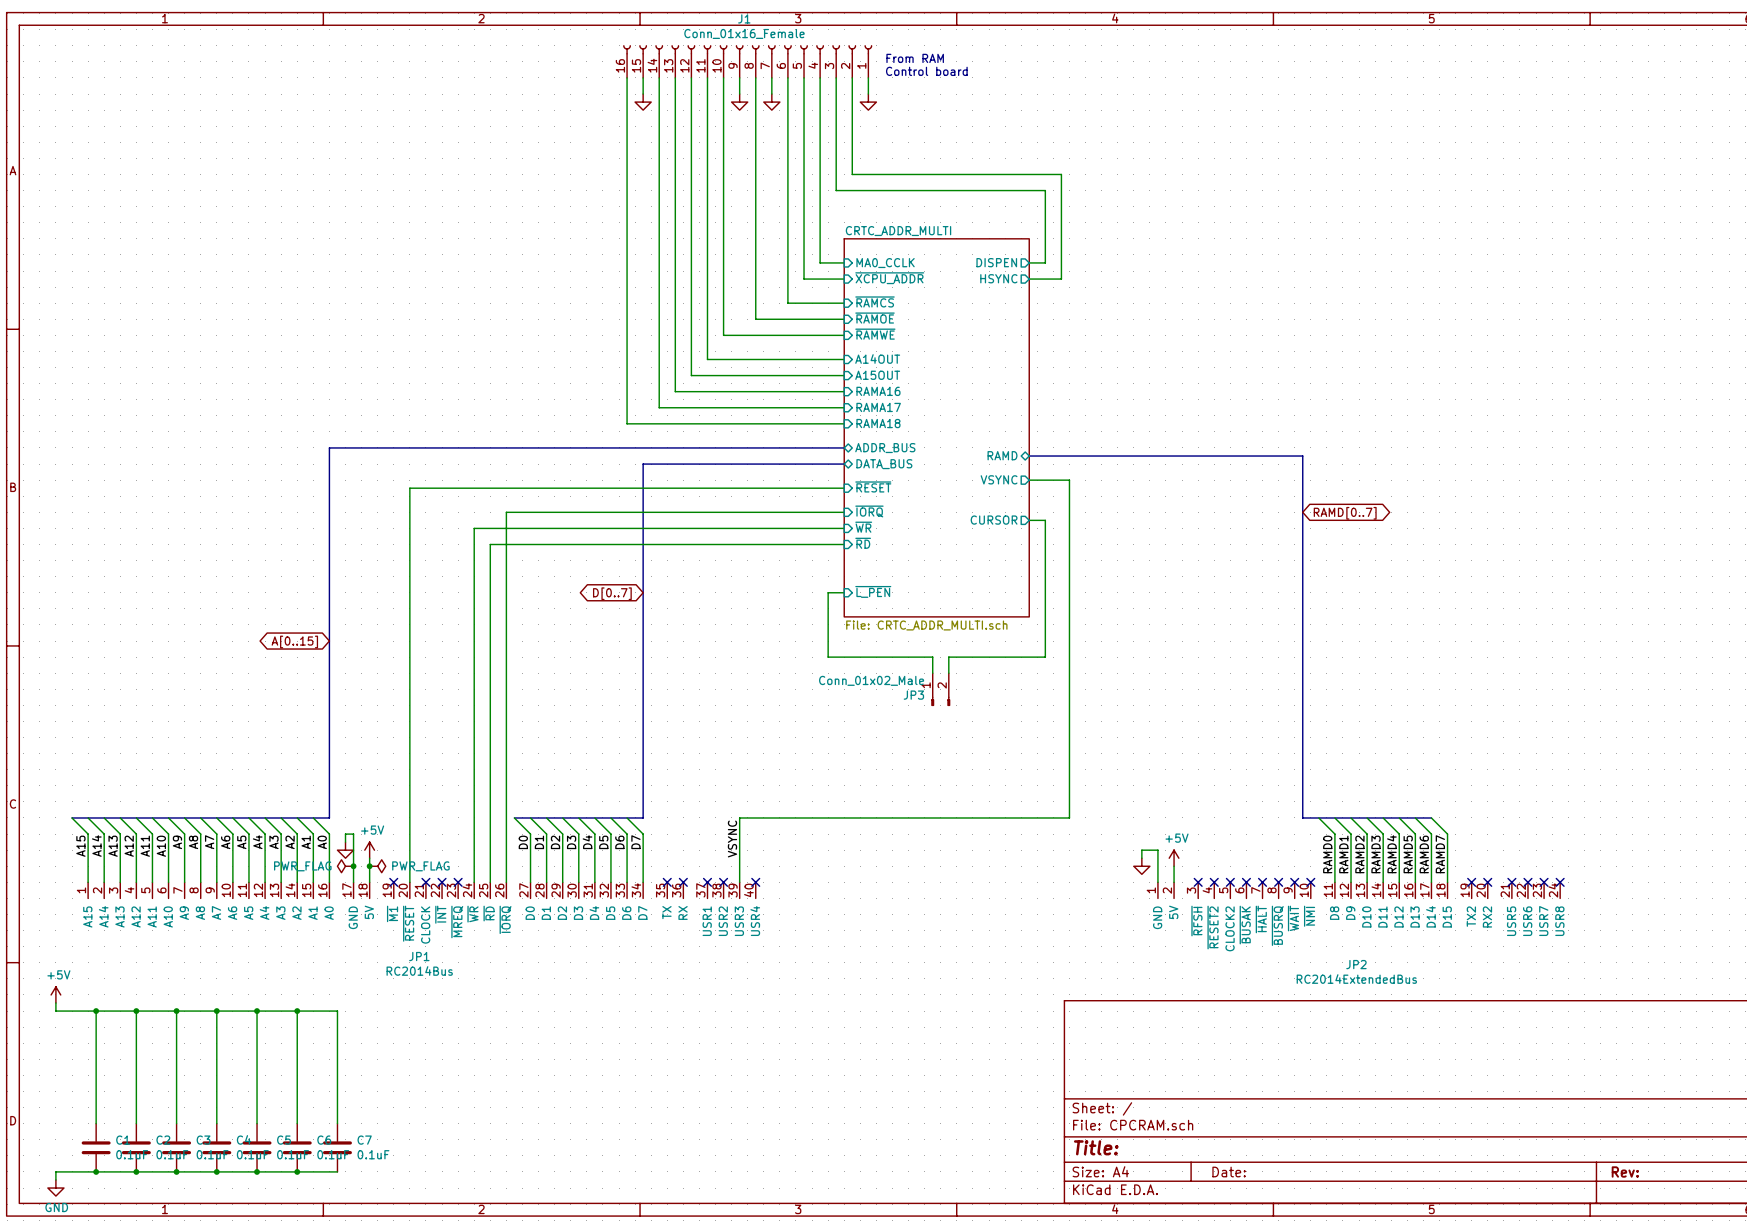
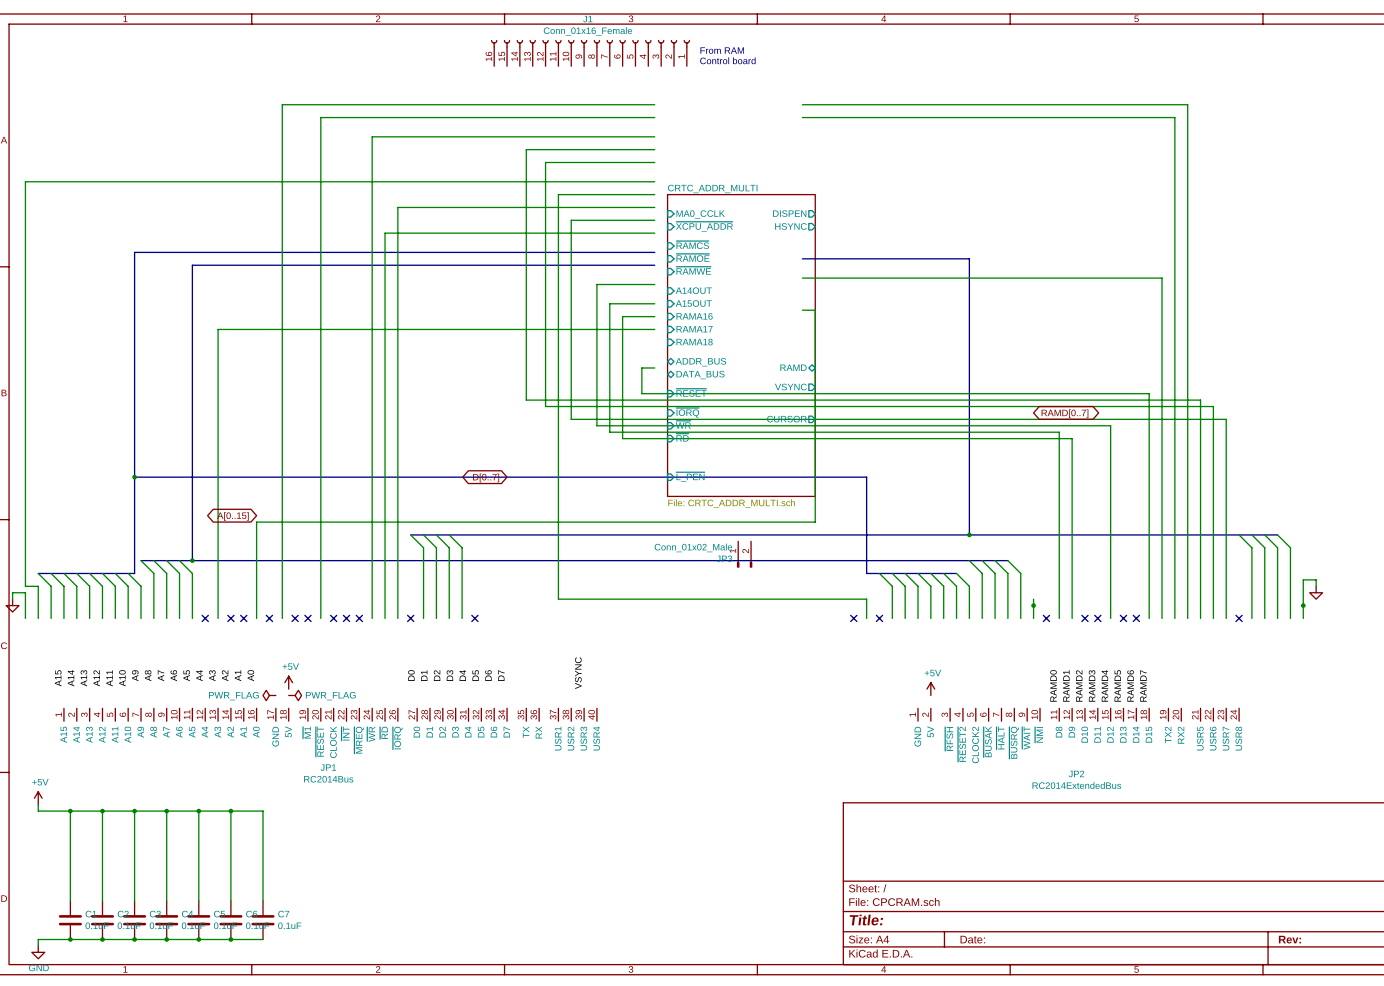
wire: (627, 77) (627, 423) (844, 423) -> none
wire: (643, 77) (643, 94) -> none
wire: (659, 77) (659, 407) -> (218, 618) (218, 329) (519, 329)
wire: (675, 77) (675, 391) (787, 391) -> (622, 438) (622, 316)
wire: (691, 77) (691, 198) -> (654, 162) (545, 162)
wire: (707, 77) (707, 238) -> (654, 194) (558, 194)
wire: (723, 77) (723, 271) -> (654, 220) (571, 220)
wire: (739, 77) (739, 94) -> none
wire: (755, 77) (755, 319) (844, 319) -> none
wire: (771, 77) (771, 94) -> none
wire: (787, 77) (787, 303) (844, 303) -> none
wire: (804, 77) (804, 279) (844, 279) -> none
wire: (820, 77) (820, 262) (844, 262) -> none
wire: (836, 77) (836, 190) (1045, 190) (1045, 262) (1029, 262) -> none
wire: (852, 77) (852, 174) (1061, 174) (1061, 279) (1029, 279) -> none
wire: (868, 77) (868, 94) -> none
power symbol: (643, 102) -> none
power symbol: (739, 102) -> none
power symbol: (771, 102) -> none
power symbol: (868, 102) -> none
wire: none -> (654, 104) (282, 104) (282, 618)
wire: none -> (802, 104) (1187, 104) (1187, 618)
wire: none -> (802, 117) (1174, 117) (1174, 618)
wire: none -> (654, 149) (526, 149) (526, 400) (1200, 400) (1200, 618)
wire: none -> (654, 181) (25, 181) (25, 586) (38, 586) (38, 618)
bus: none -> (654, 252) (134, 252) (134, 573) (38, 573)
bus: none -> (802, 258) (969, 258) (969, 534)
bus: none -> (654, 265) (192, 265) (192, 560)
wire: (723, 335) (844, 335) -> (571, 271) (571, 419) (815, 419)
wire: none -> (802, 278) (1162, 278) (1162, 618)
wire: none -> (654, 284) (596, 284) (596, 425)
wire: (707, 359) (844, 359) -> (558, 290) (558, 599) (866, 599) (866, 618)
wire: (691, 375) (771, 375) -> (1059, 618) (1059, 432) (609, 432) (609, 303)
wire: none -> (545, 303) (545, 406) (1213, 406) (1213, 618)
wire: (828, 375) (844, 375) -> none
wire: none -> (802, 310) (815, 310) (815, 522) (256, 522) (256, 618)
wire: (828, 391) (844, 391) -> none
wire: (828, 407) (844, 407) -> none
bus: (844, 447) (329, 447) (329, 817) (72, 817) -> none
wire: none -> (654, 367) (641, 367) (641, 393)
bus: (1029, 456) (1302, 456) (1302, 817) (1431, 817) -> none
bus: (844, 464) (643, 464) (643, 817) (514, 817) -> none
wire: (1029, 480) (1069, 480) (1069, 817) (739, 817) (739, 882) -> none
wire: (409, 488) (812, 488) -> (320, 393) (320, 117) (654, 117)
wire: none -> (667, 393) (1149, 393) (1149, 618)
wire: (506, 512) (844, 512) -> (397, 412) (397, 207) (654, 207)
wire: (1045, 520) (1045, 657) (948, 657) (948, 673) -> (828, 419) (1226, 419) (1226, 618)
wire: (474, 528) (755, 528) -> (372, 425) (372, 136) (654, 136)
wire: none -> (667, 425) (1110, 425) (1110, 618)
wire: (490, 544) (787, 544) -> (385, 438) (385, 233) (654, 233)
wire: none -> (667, 438) (1072, 438) (1072, 618)
bus: none -> (134, 477) (866, 477) (866, 573) (956, 573)
junction: none -> (134, 477)
wire: (844, 592) (828, 592) (828, 657) (932, 657) (932, 673) -> none
wire: none -> (410, 534) (423, 547) (423, 618)
bus: none -> (410, 534) (1277, 534)
wire: none -> (423, 534) (436, 547) (436, 618)
wire: none -> (436, 534) (449, 547) (449, 618)
wire: none -> (449, 534) (462, 547) (462, 618)
junction: none -> (969, 534)
wire: none -> (1239, 534) (1251, 547) (1251, 618)
wire: none -> (1251, 534) (1264, 547) (1264, 618)
wire: none -> (1264, 534) (1277, 547) (1277, 618)
wire: none -> (1277, 534) (1290, 547) (1290, 618)
wire: none -> (141, 560) (153, 573) (153, 618)
bus: none -> (141, 560) (1007, 560)
wire: none -> (153, 560) (166, 573) (166, 618)
wire: none -> (166, 560) (179, 573) (179, 618)
wire: none -> (179, 560) (192, 573) (192, 618)
junction: none -> (192, 560)
wire: none -> (969, 560) (982, 573) (982, 618)
wire: none -> (982, 560) (995, 573) (995, 618)
wire: none -> (995, 560) (1007, 573) (1007, 618)
wire: none -> (1007, 560) (1020, 573) (1020, 618)
wire: none -> (38, 573) (51, 586) (51, 618)
wire: none -> (51, 573) (63, 586) (63, 618)
wire: none -> (63, 573) (76, 586) (76, 618)
wire: none -> (76, 573) (89, 586) (89, 618)
wire: none -> (89, 573) (102, 586) (102, 618)
wire: none -> (102, 573) (115, 586) (115, 618)
wire: none -> (115, 573) (128, 586) (128, 618)
wire: none -> (128, 573) (141, 586) (141, 618)
wire: none -> (879, 573) (892, 586) (892, 618)
wire: none -> (892, 573) (905, 586) (905, 618)
wire: none -> (905, 573) (918, 586) (918, 618)
wire: none -> (918, 573) (930, 586) (930, 618)
wire: none -> (930, 573) (943, 586) (943, 618)
wire: none -> (943, 573) (956, 586) (956, 618)
wire: none -> (956, 573) (969, 586) (969, 618)
wire: none -> (1316, 586) (1316, 579) (1303, 579) (1303, 618)
power symbol: none -> (1316, 592)
wire: none -> (12, 599) (12, 592) (25, 592) (25, 618)
power symbol: none -> (12, 605)
junction: none -> (1033, 605)
junction: none -> (1303, 605)
no-connect mark: none -> (205, 618)
no-connect mark: none -> (230, 618)
no-connect mark: none -> (243, 618)
no-connect mark: none -> (269, 618)
no-connect mark: none -> (295, 618)
no-connect mark: none -> (307, 618)
wire: (409, 769) (409, 882) -> none
no-connect mark: none -> (333, 618)
no-connect mark: none -> (346, 618)
no-connect mark: none -> (359, 618)
wire: (474, 769) (474, 882) -> none
wire: (490, 769) (490, 882) -> none
wire: (506, 769) (506, 882) -> none
no-connect mark: none -> (410, 618)
no-connect mark: none -> (474, 618)
no-connect mark: none -> (853, 618)
no-connect mark: none -> (879, 618)
no-connect mark: none -> (1046, 618)
no-connect mark: none -> (1084, 618)
no-connect mark: none -> (1097, 618)
no-connect mark: none -> (1123, 618)
no-connect mark: none -> (1136, 618)
no-connect mark: none -> (1239, 618)
wire: (72, 817) (88, 834) (88, 882) -> none
wire: (88, 817) (104, 834) (104, 882) -> none
wire: (104, 817) (120, 834) (120, 882) -> none
wire: (120, 817) (136, 834) (136, 882) -> none
wire: (136, 817) (152, 834) (152, 882) -> none
wire: (152, 817) (168, 834) (168, 882) -> none
wire: (168, 817) (184, 834) (184, 882) -> none
wire: (184, 817) (200, 834) (200, 882) -> none
wire: (200, 817) (216, 834) (216, 882) -> none
wire: (216, 817) (232, 834) (232, 882) -> none
wire: (232, 817) (248, 834) (248, 882) -> none
wire: (248, 817) (265, 834) (265, 882) -> none
wire: (265, 817) (281, 834) (281, 882) -> none
wire: (281, 817) (297, 834) (297, 882) -> none
wire: (297, 817) (313, 834) (313, 882) -> none
wire: (313, 817) (329, 834) (329, 882) -> none
wire: (514, 817) (530, 834) (530, 882) -> none
wire: (530, 817) (546, 834) (546, 882) -> none
wire: (546, 817) (562, 834) (562, 882) -> none
wire: (562, 817) (578, 834) (578, 882) -> none
wire: (578, 817) (594, 834) (594, 882) -> none
wire: (594, 817) (610, 834) (610, 882) -> none
wire: (610, 817) (627, 834) (627, 882) -> none
wire: (627, 817) (643, 834) (643, 882) -> none
wire: (1318, 817) (1334, 834) (1334, 882) -> none
wire: (1334, 817) (1351, 834) (1351, 882) -> none
wire: (1351, 817) (1367, 834) (1367, 882) -> none
wire: (1367, 817) (1383, 834) (1383, 882) -> none
wire: (1383, 817) (1399, 834) (1399, 882) -> none
wire: (1399, 817) (1415, 834) (1415, 882) -> none
wire: (1415, 817) (1431, 834) (1431, 882) -> none
wire: (1431, 817) (1447, 834) (1447, 882) -> none
wire: (345, 842) (345, 834) (353, 834) (353, 882) -> none
power symbol: (345, 850) -> none
wire: (369, 858) (369, 882) -> none
wire: (1141, 858) (1141, 850) (1157, 850) (1157, 882) -> none
junction: (353, 866) -> none
junction: (369, 866) -> none
power symbol: (1141, 866) -> none
wire: (1174, 866) (1174, 882) -> none
no-connect mark: (393, 882) -> none
no-connect mark: (425, 882) -> none
no-connect mark: (442, 882) -> none
no-connect mark: (458, 882) -> none
no-connect mark: (667, 882) -> none
no-connect mark: (683, 882) -> none
no-connect mark: (707, 882) -> none
no-connect mark: (723, 882) -> none
no-connect mark: (755, 882) -> none
no-connect mark: (1198, 882) -> none
no-connect mark: (1214, 882) -> none
no-connect mark: (1230, 882) -> none
no-connect mark: (1246, 882) -> none
no-connect mark: (1262, 882) -> none
no-connect mark: (1278, 882) -> none
no-connect mark: (1294, 882) -> none
no-connect mark: (1310, 882) -> none
no-connect mark: (1471, 882) -> none
no-connect mark: (1487, 882) -> none
no-connect mark: (1511, 882) -> none
no-connect mark: (1527, 882) -> none
no-connect mark: (1544, 882) -> none
no-connect mark: (1560, 882) -> none

